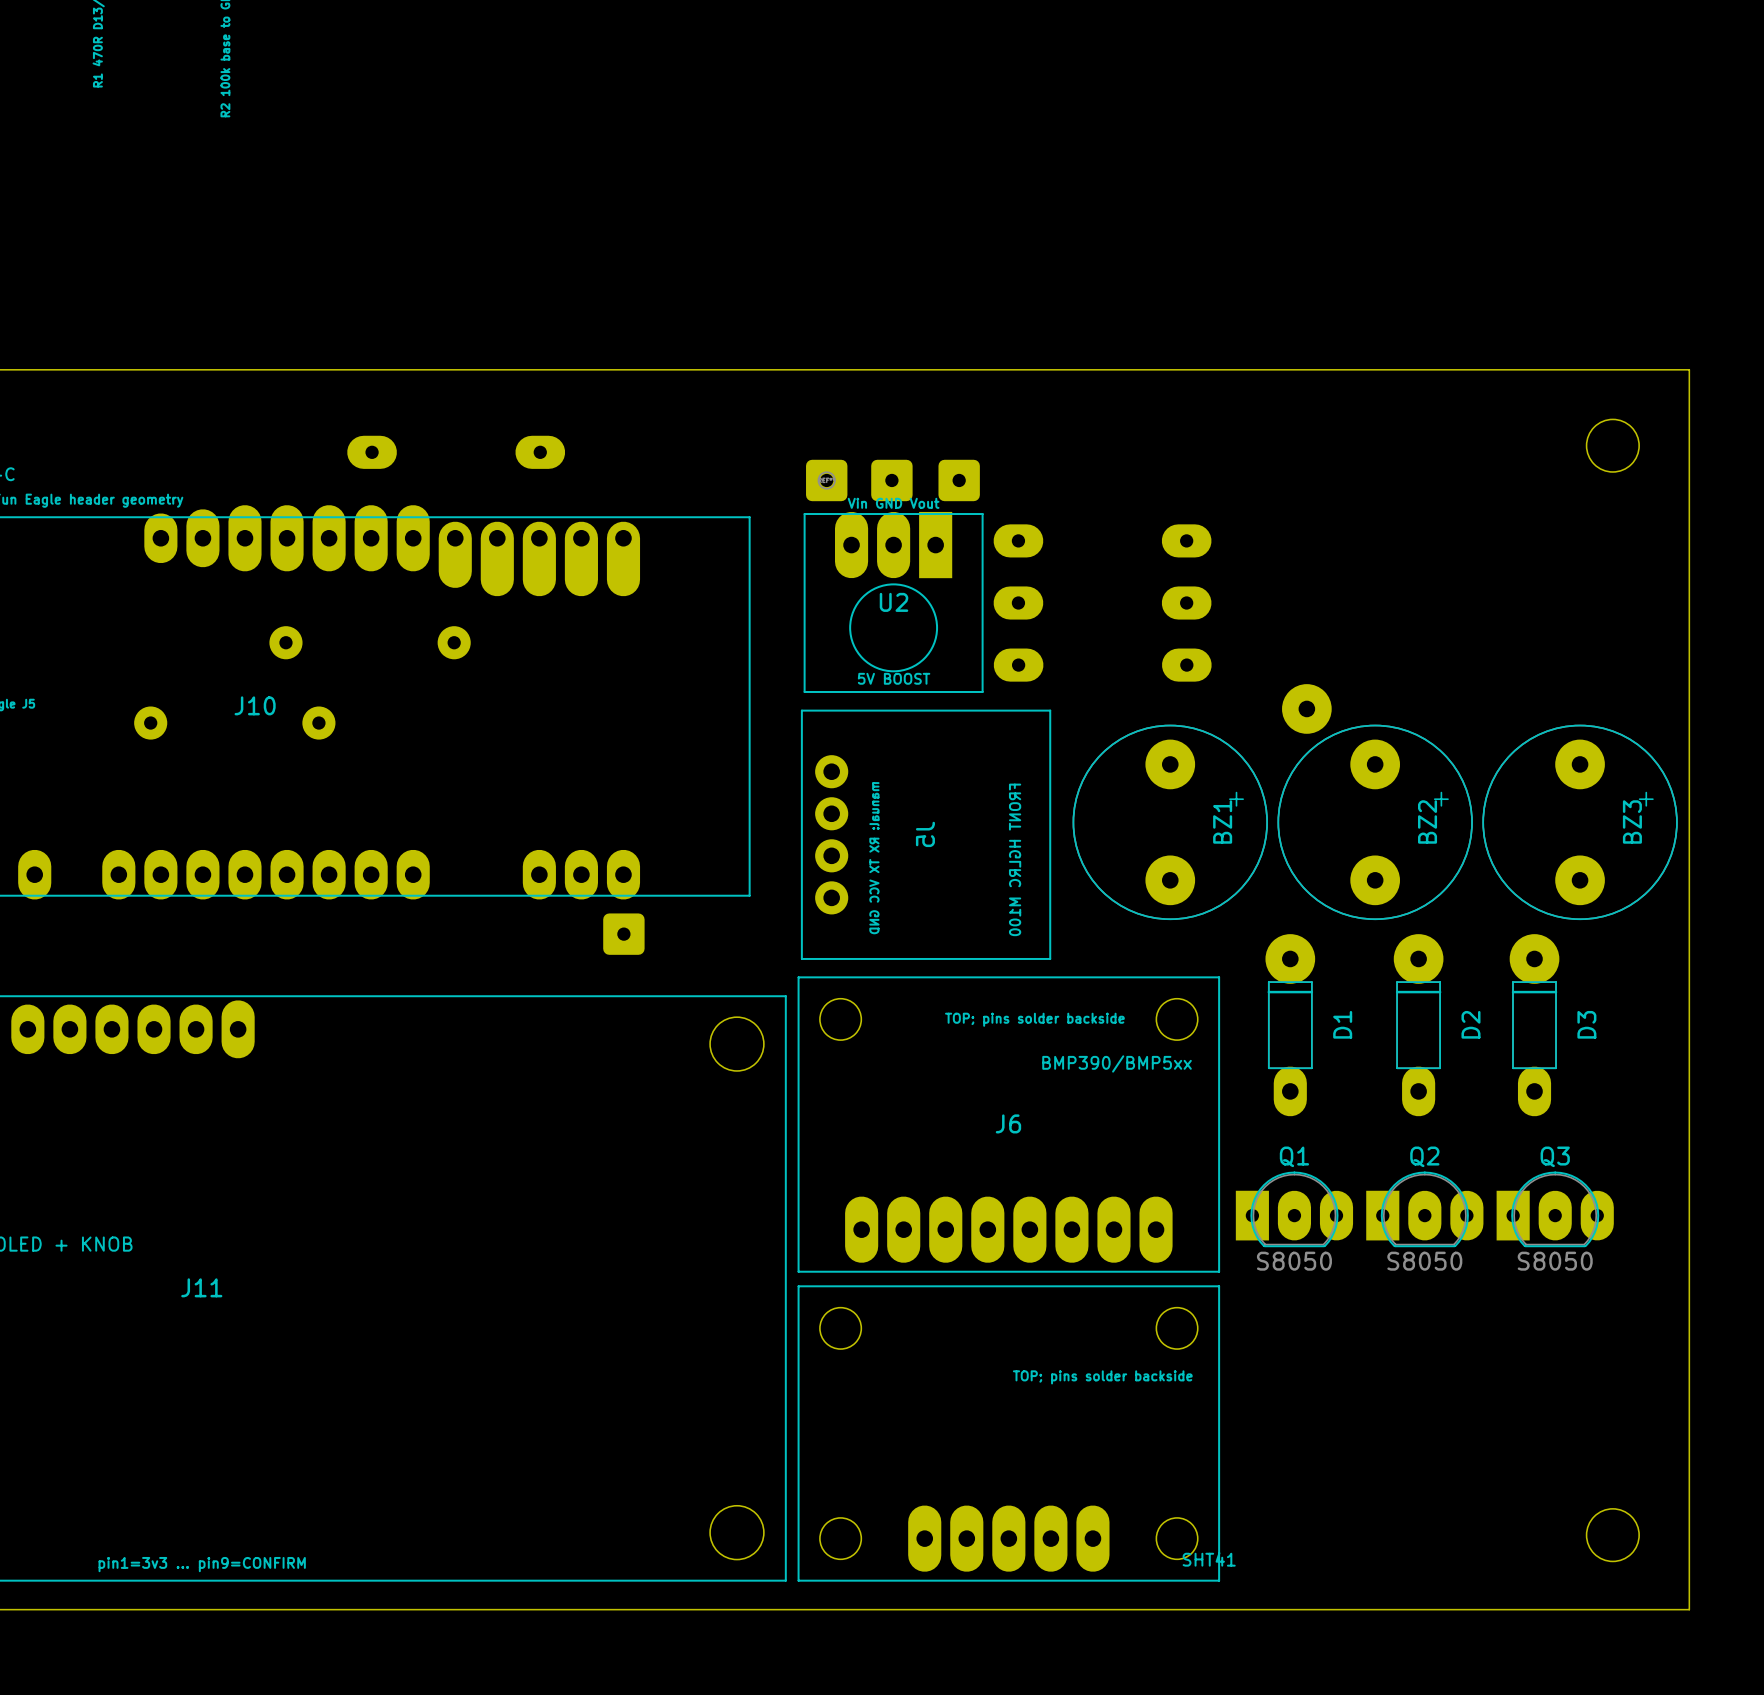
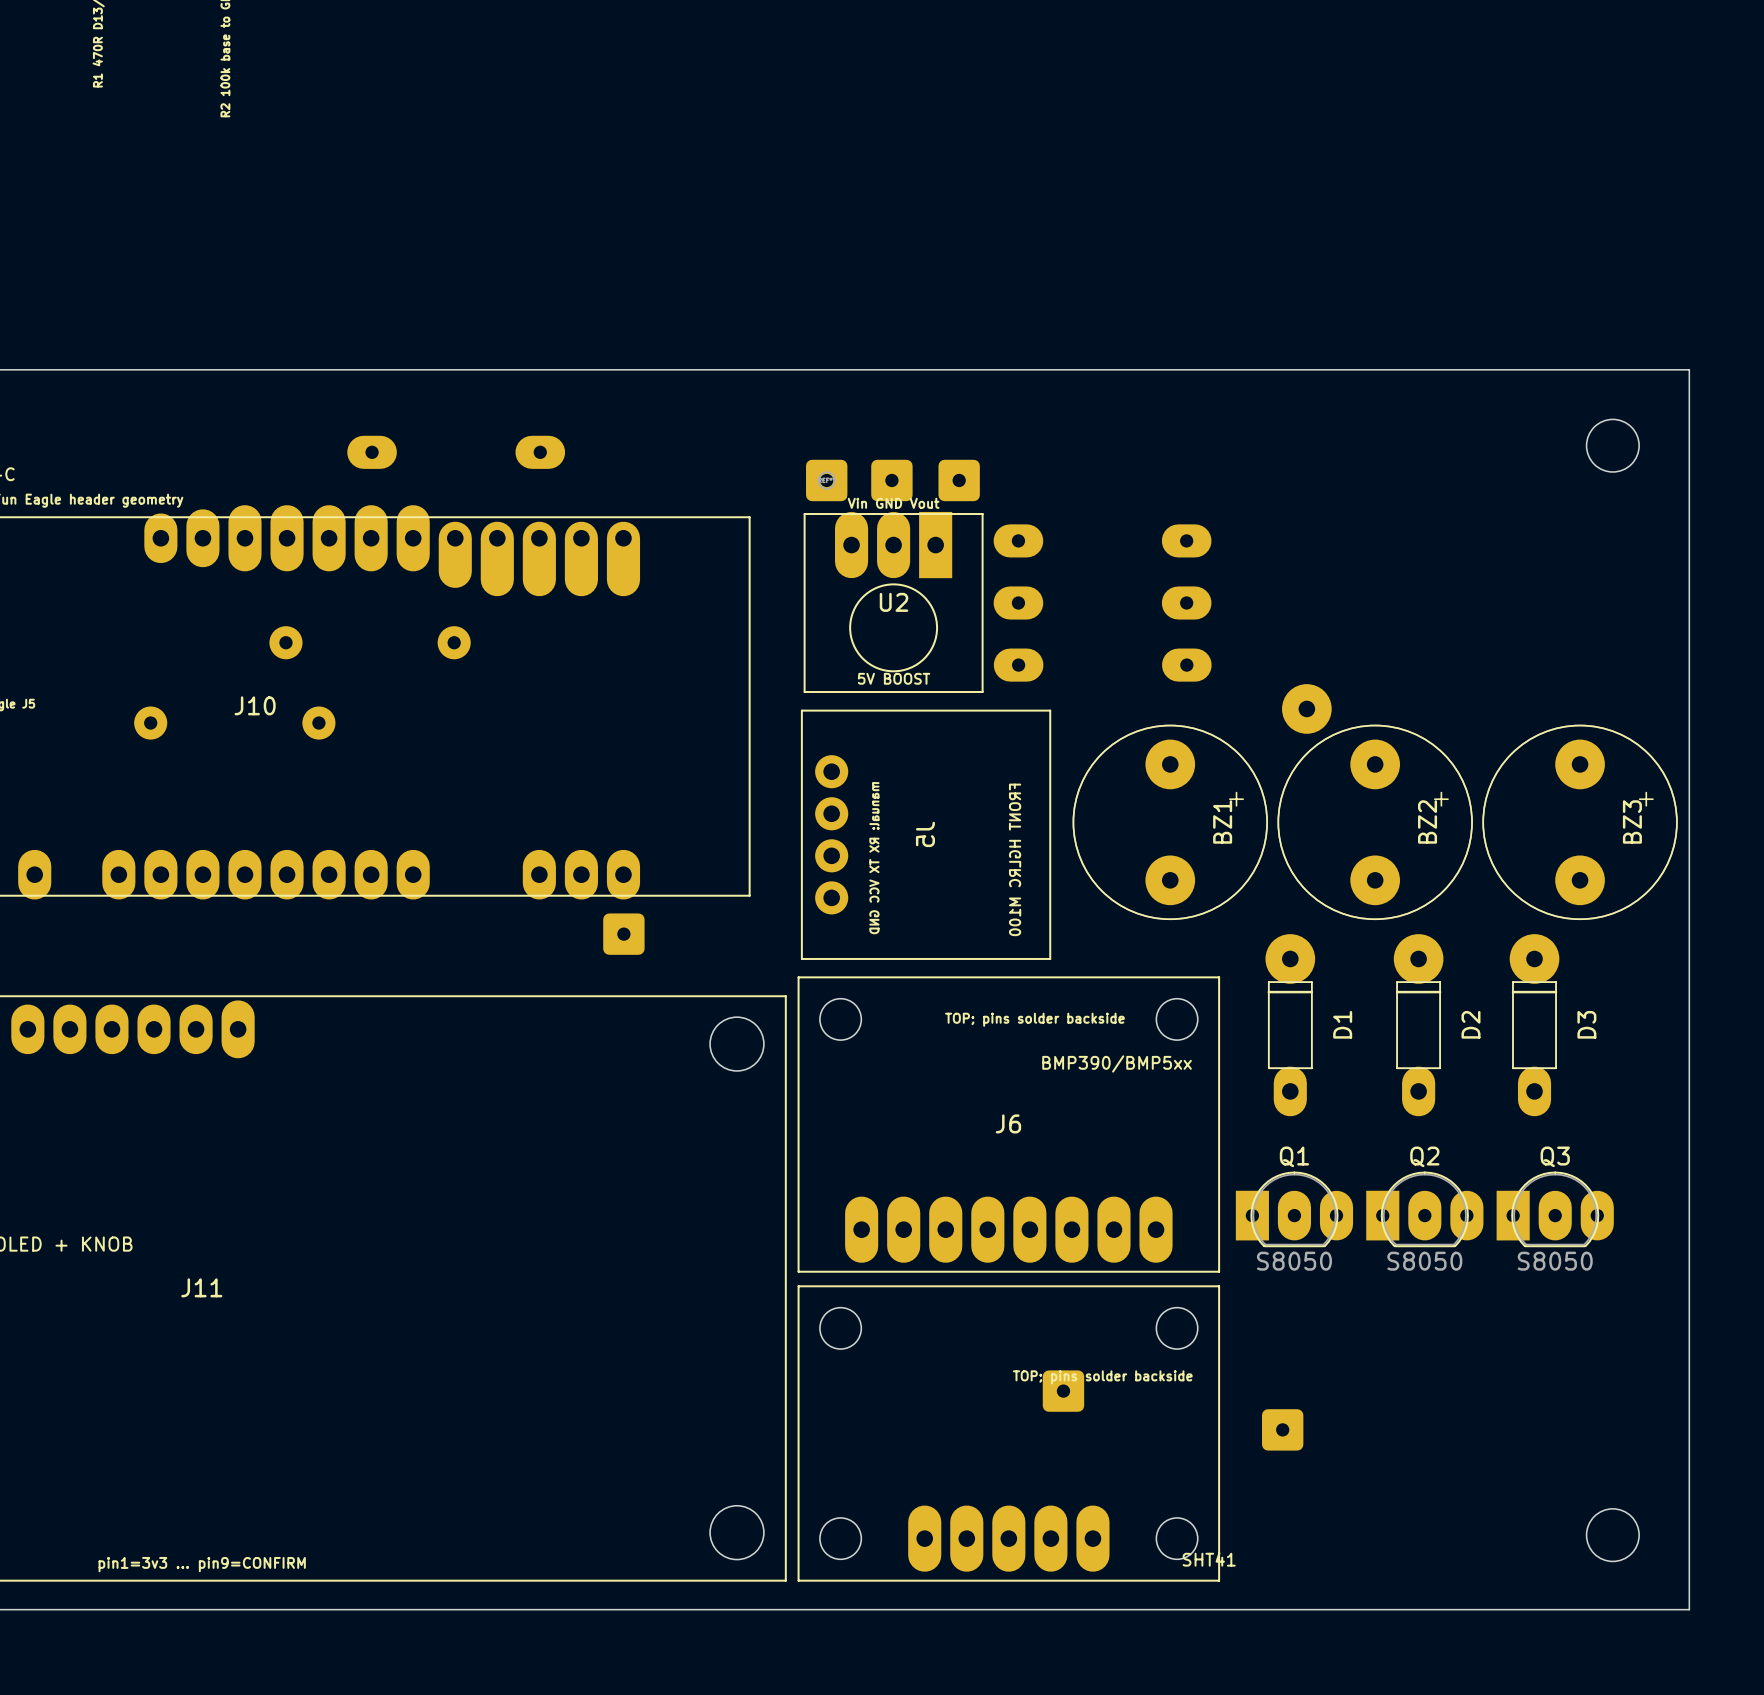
part: none -> (1063, 1391)
part: none -> (1282, 1429)

